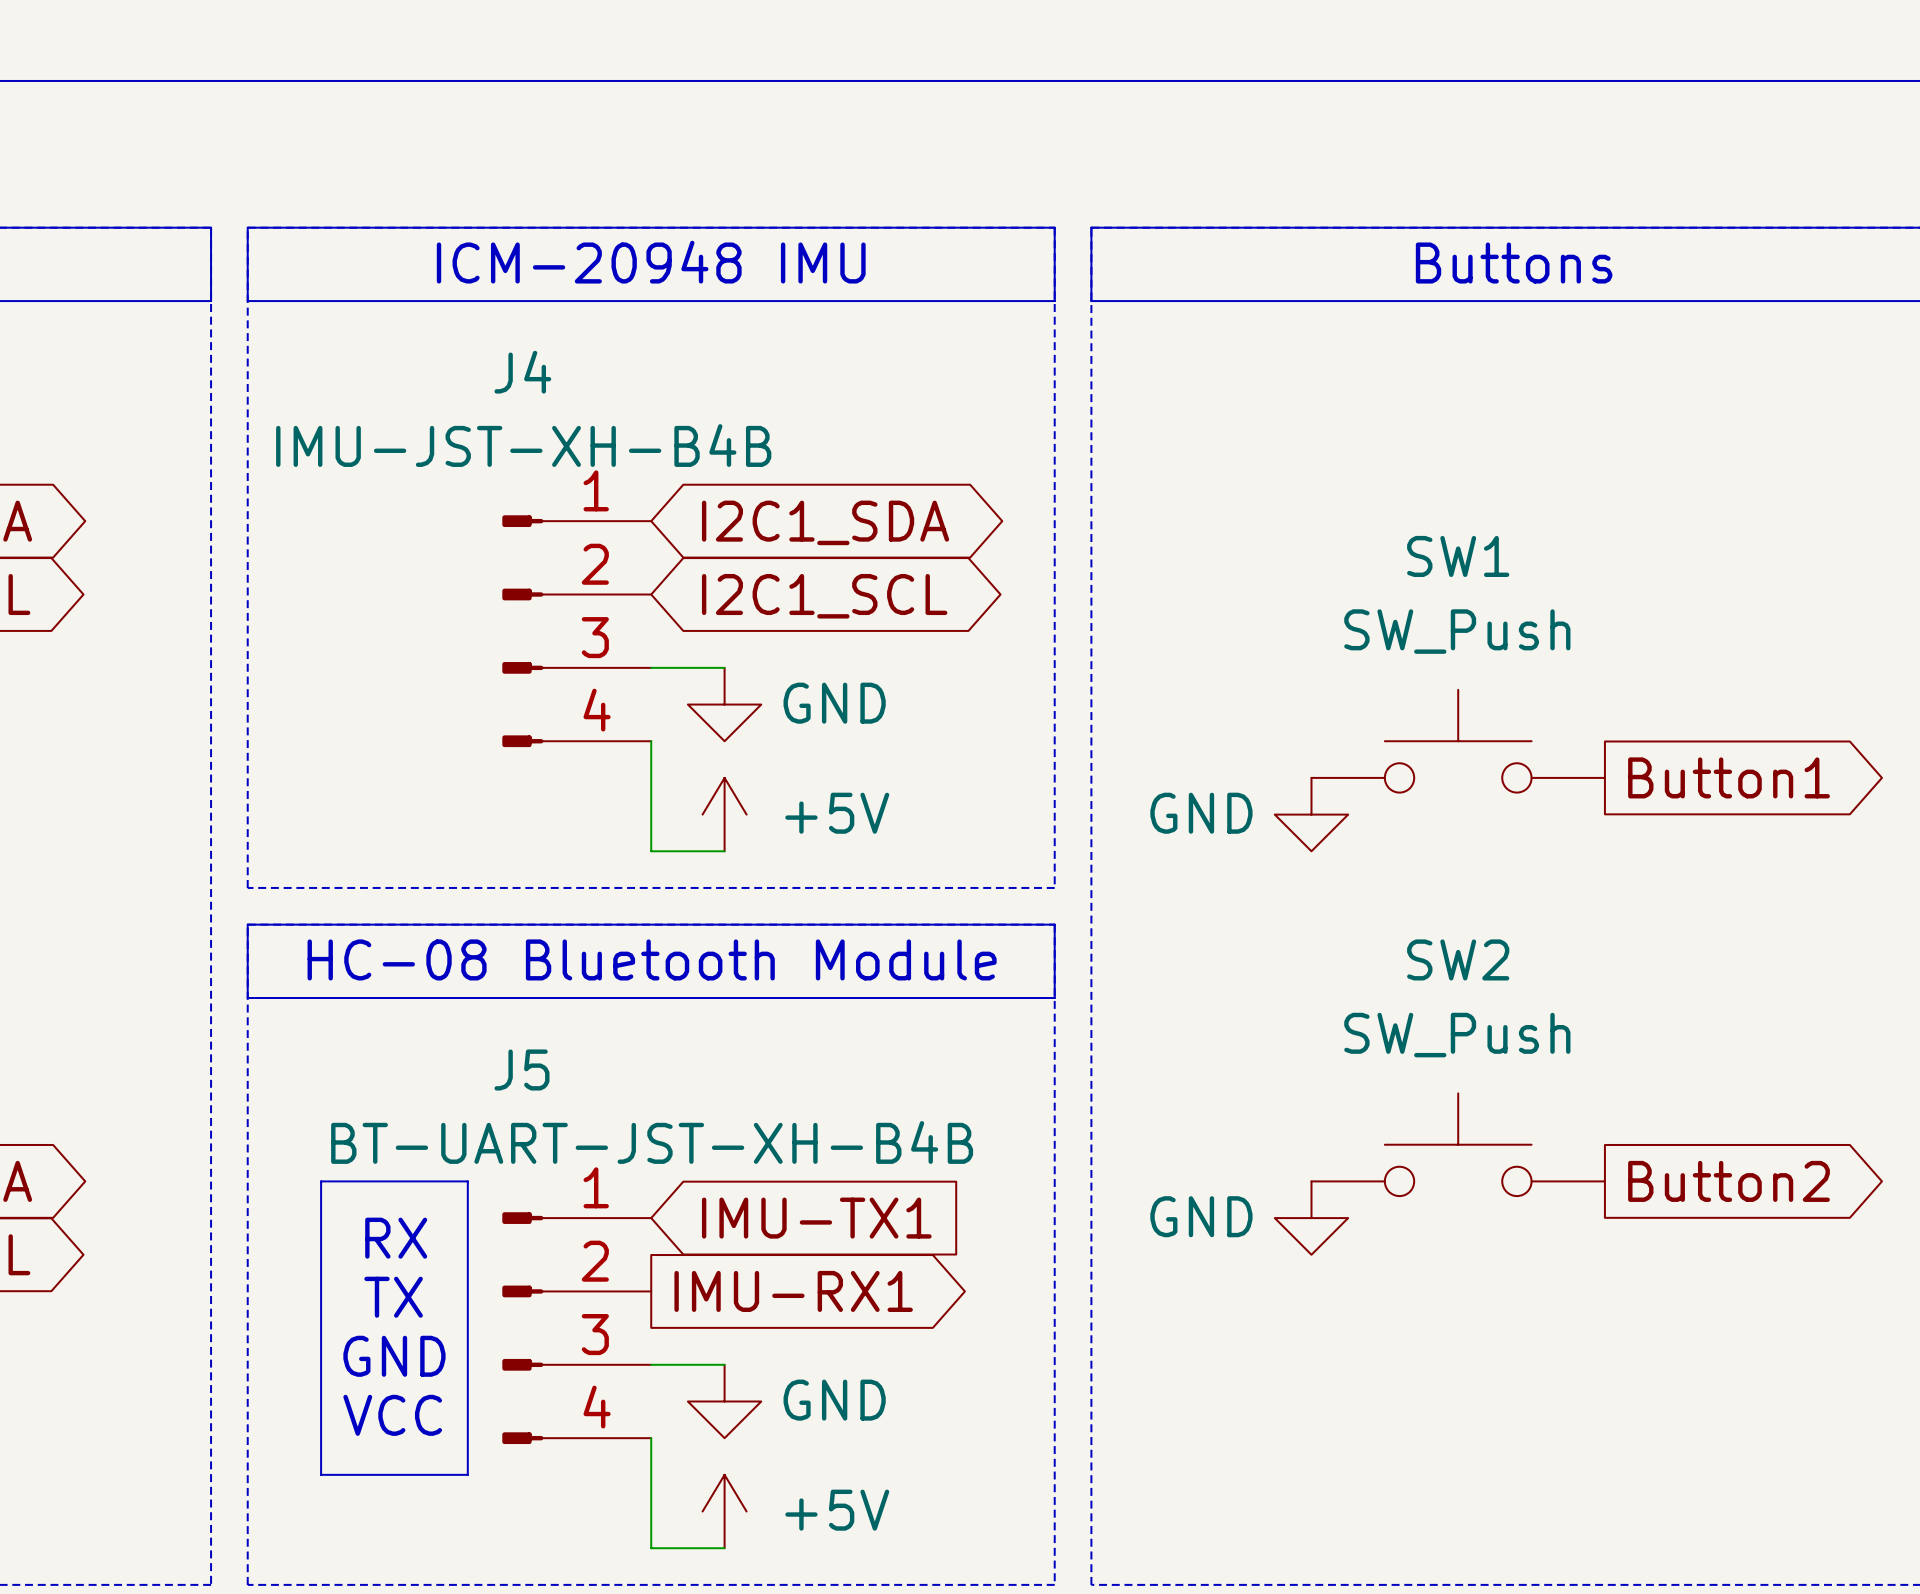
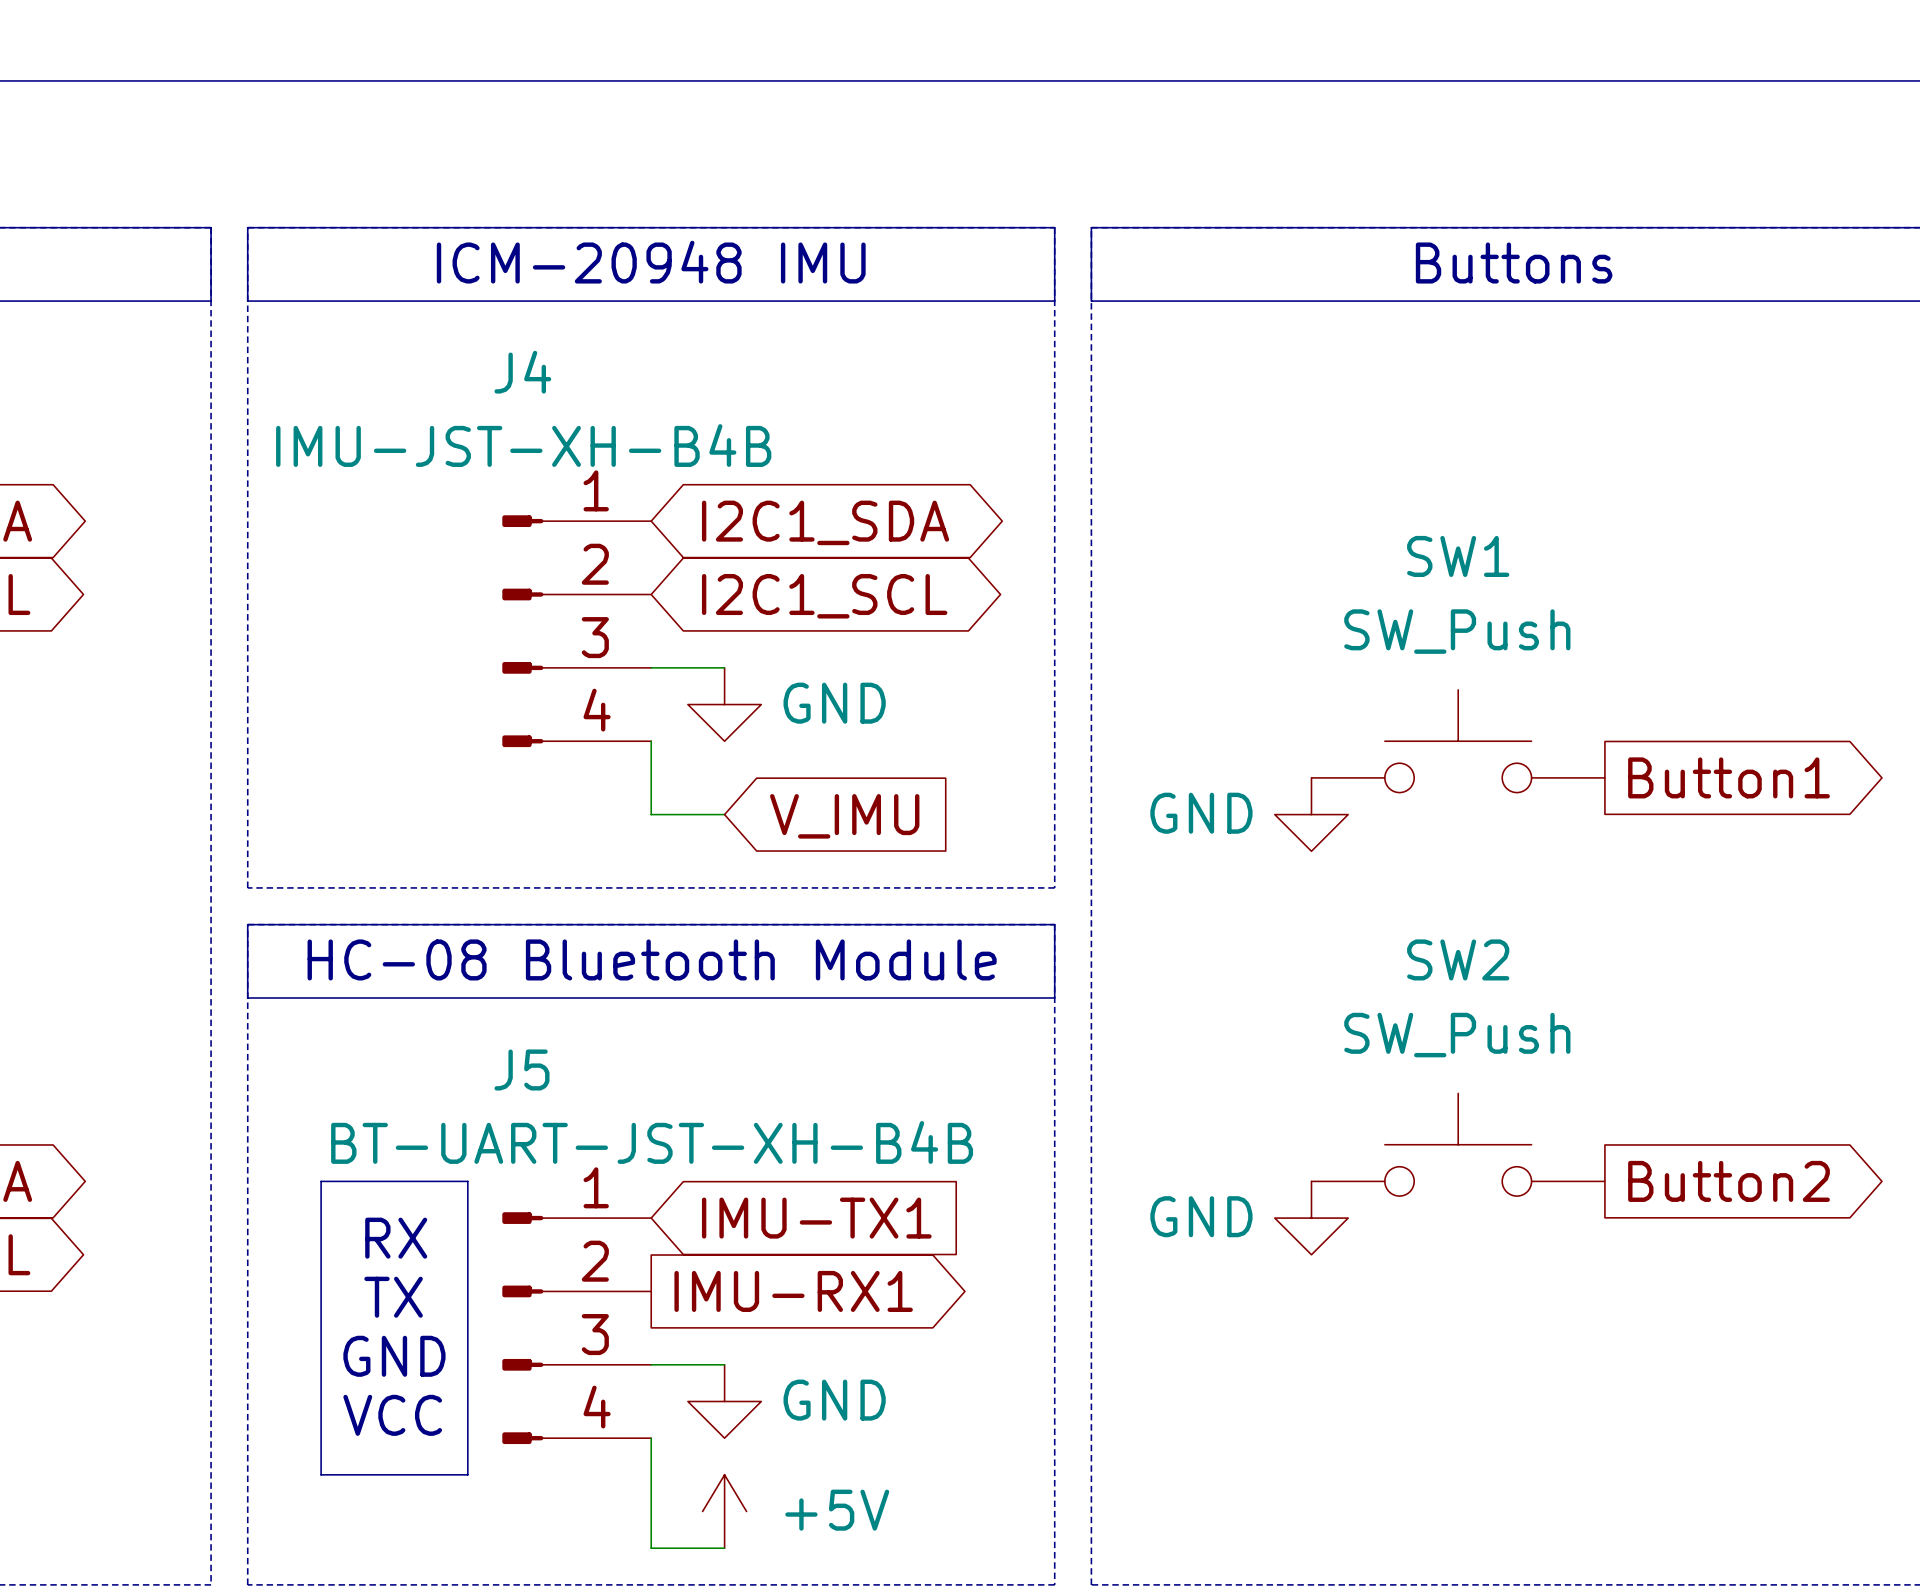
wire: (651, 814) (651, 851) (724, 851) -> (651, 814) (724, 814)
power symbol: +5V (724, 814) -> none
global label: none -> V_IMU (844, 816)

